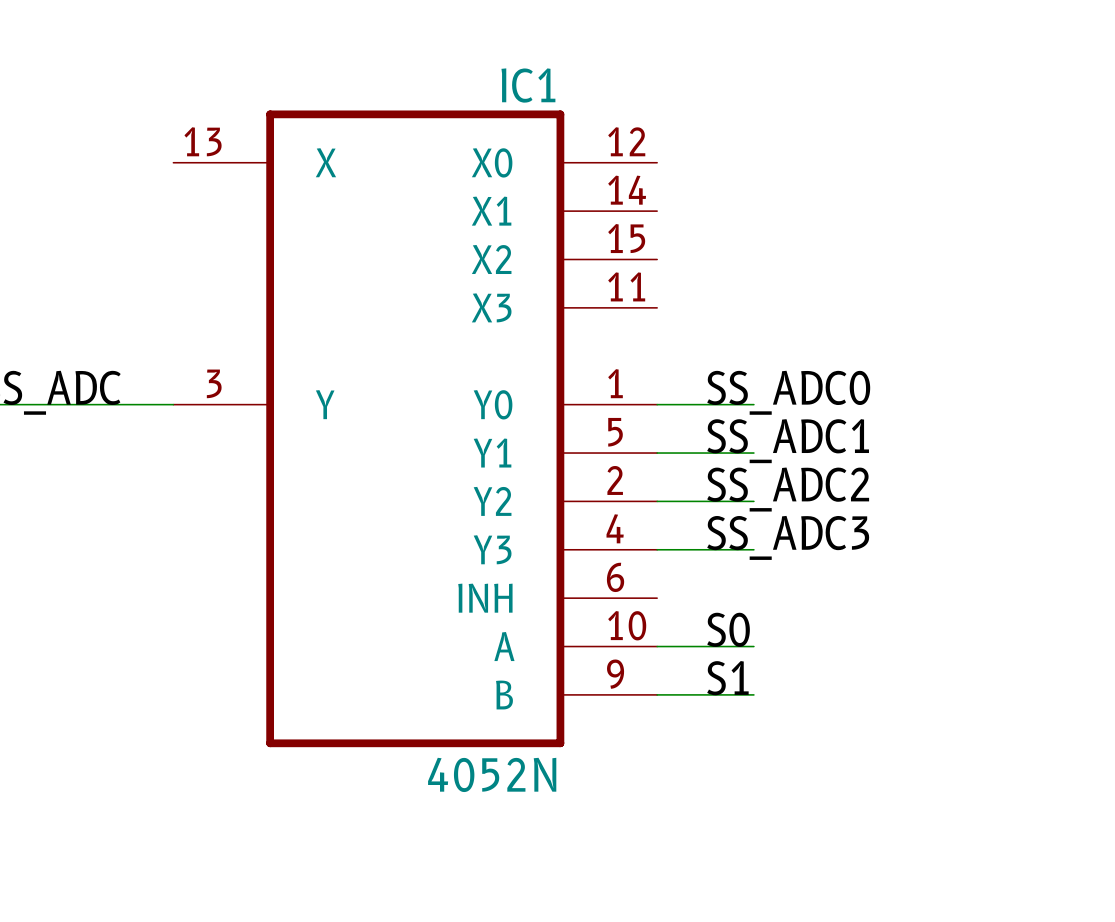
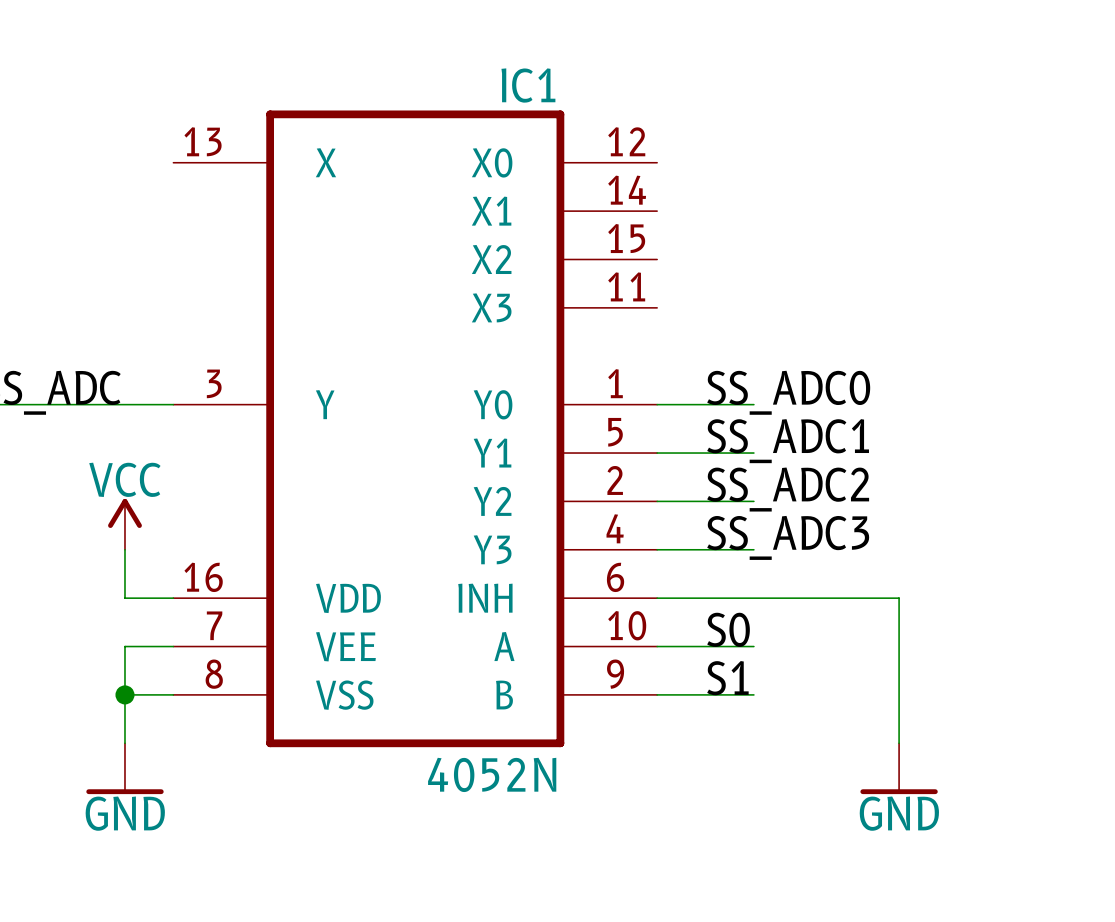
IC1 symbol: [173, 110, 658, 748] -> [173, 110, 658, 748]
power symbol: none -> VCC (124, 524)
wire: none -> (124, 549) (124, 598) (173, 598)
wire: none -> (657, 598) (899, 598) (899, 743)
wire: none -> (173, 646) (124, 646) (124, 743)
wire: none -> (124, 694) (173, 694)
junction: none -> (124, 694)
power symbol: none -> GND (124, 768)
power symbol: none -> GND (899, 768)

